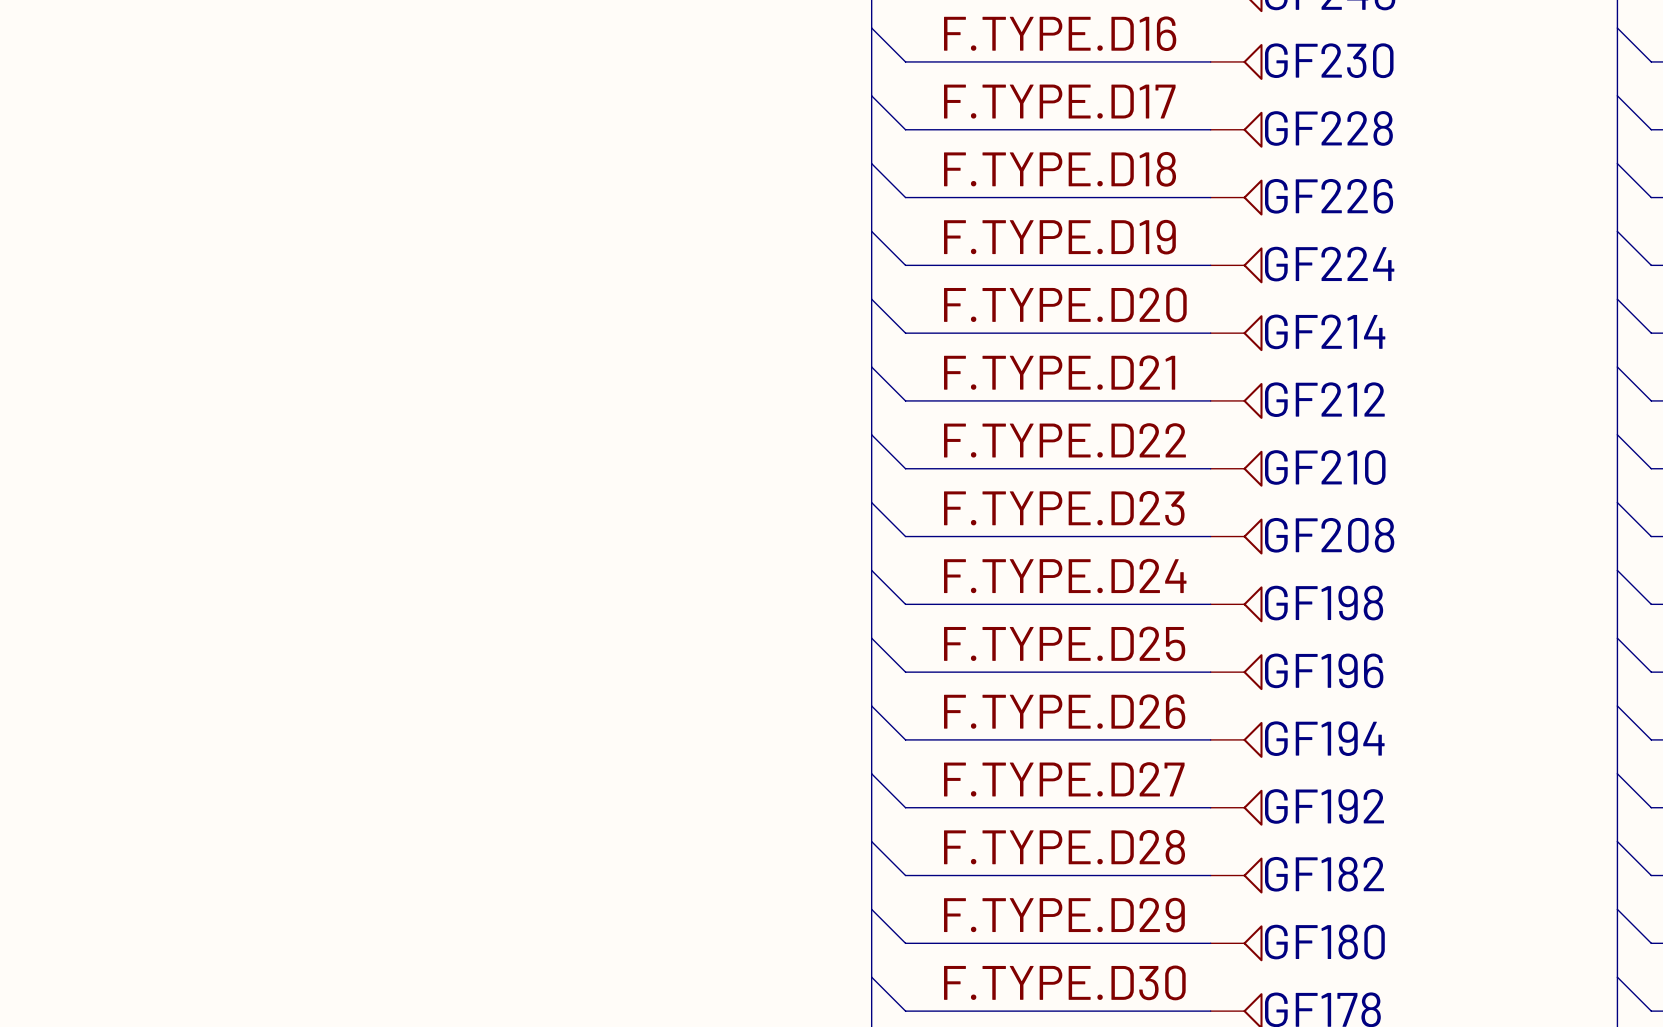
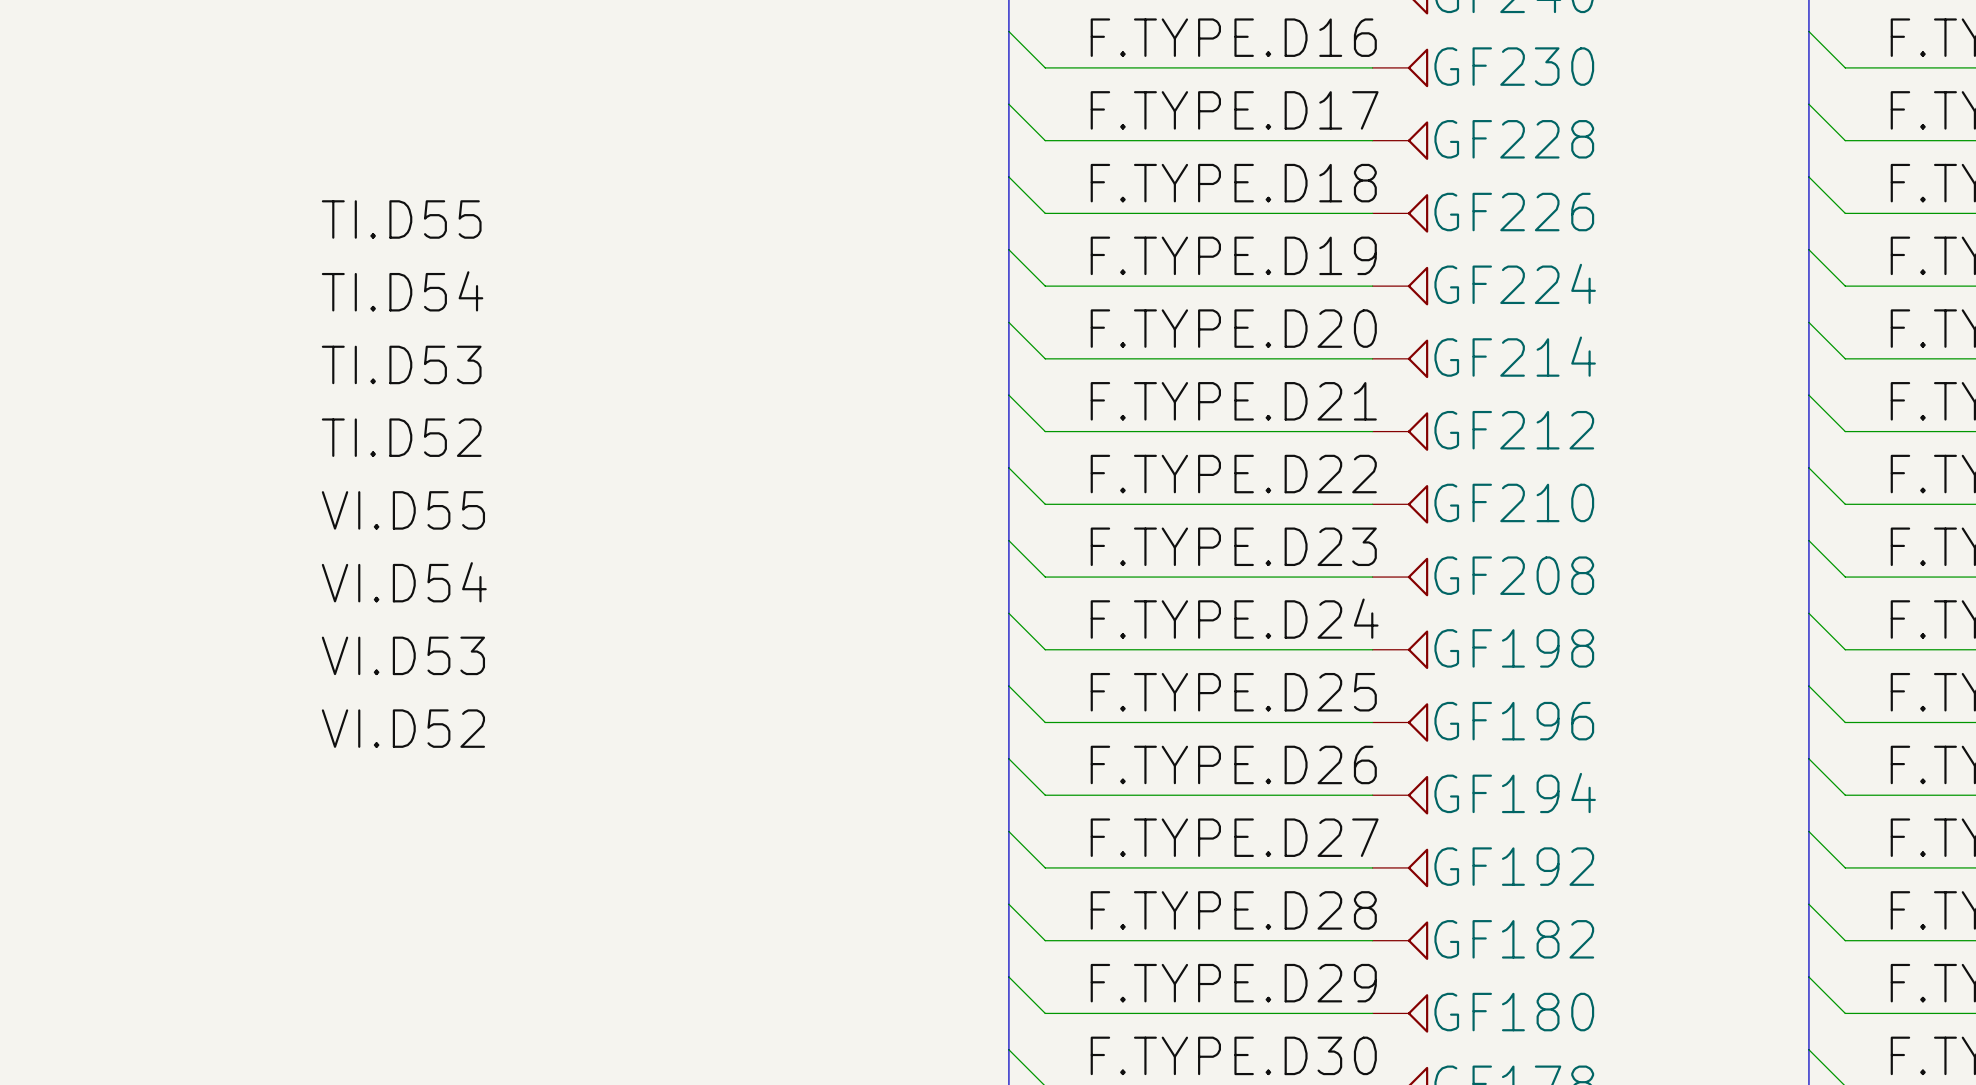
label: none -> TI.D55 (401, 219)
label: none -> TI.D54 (402, 291)
label: none -> TI.D53 (401, 364)
label: none -> TI.D52 (401, 437)
label: none -> VI.D55 (403, 510)
label: none -> VI.D54 (404, 582)
label: none -> VI.D53 (403, 655)
label: none -> VI.D52 (403, 728)

